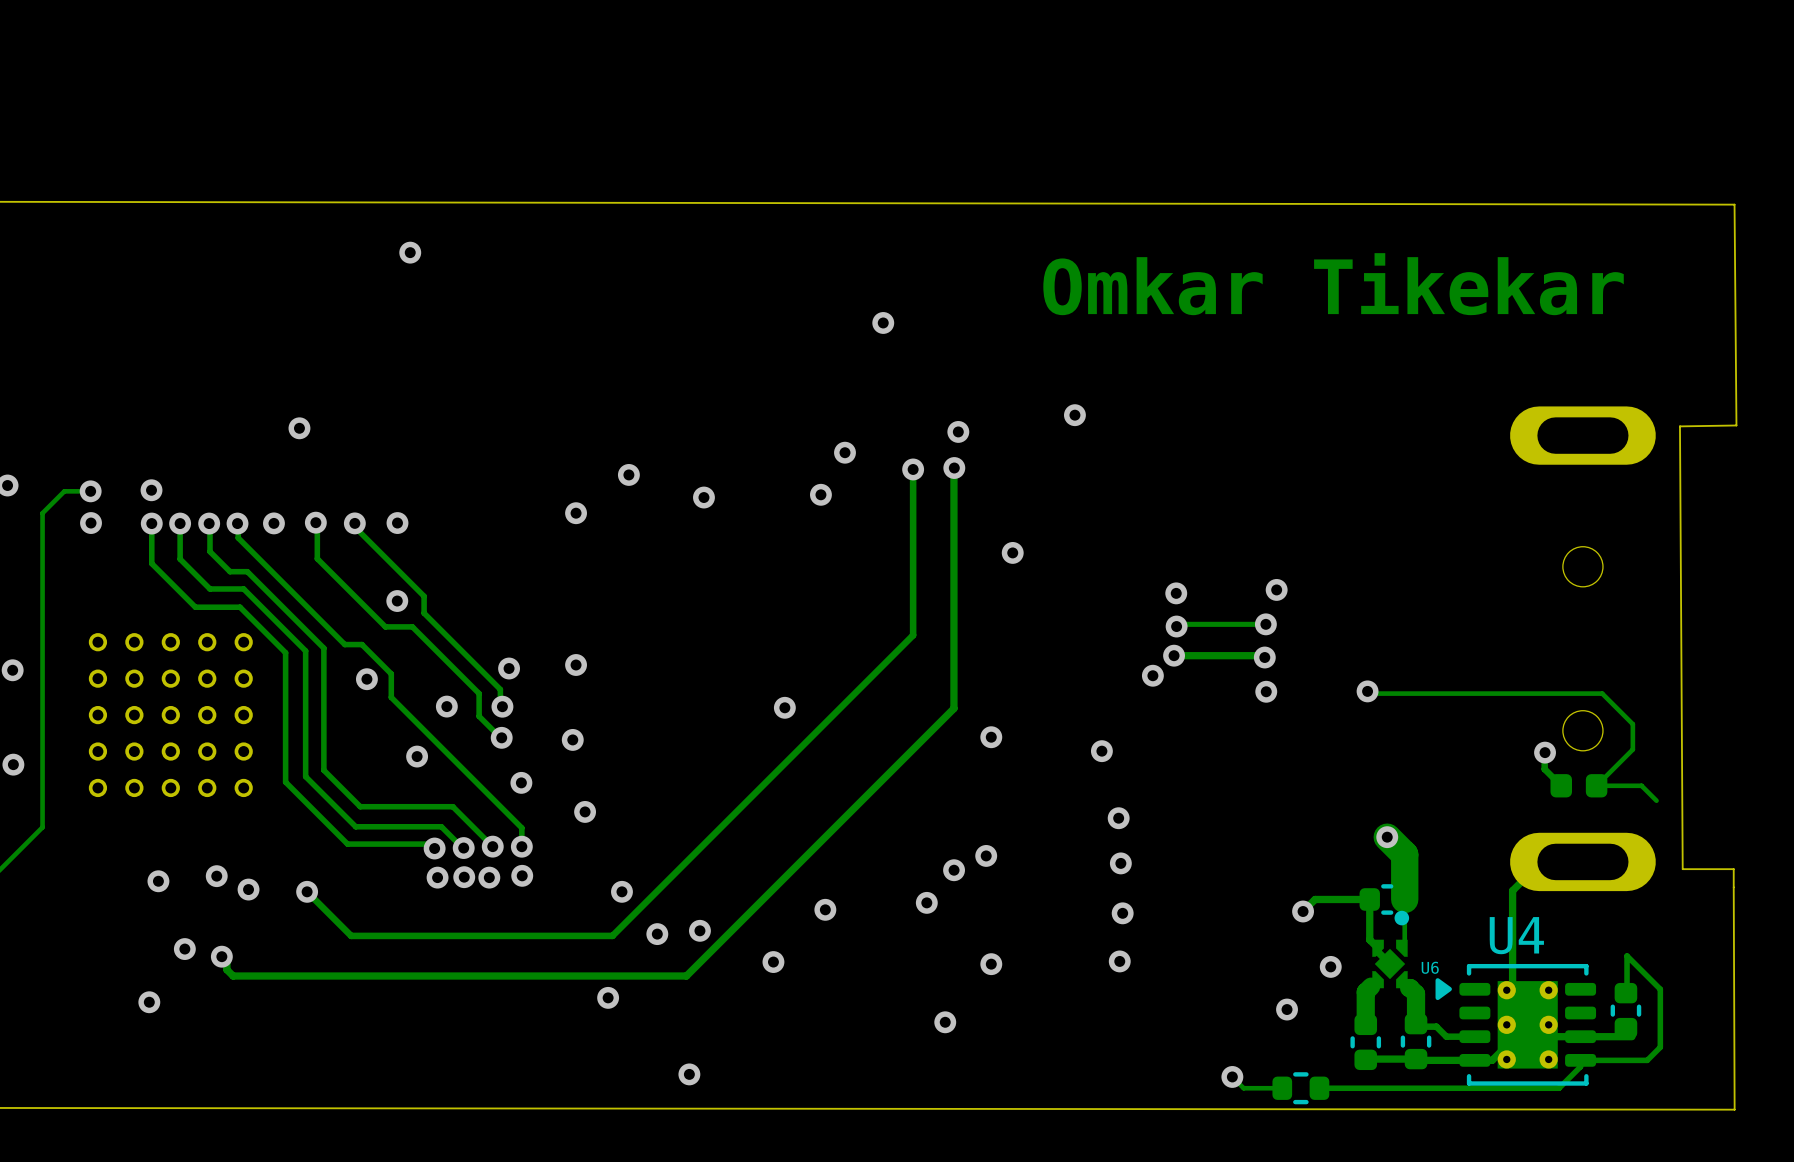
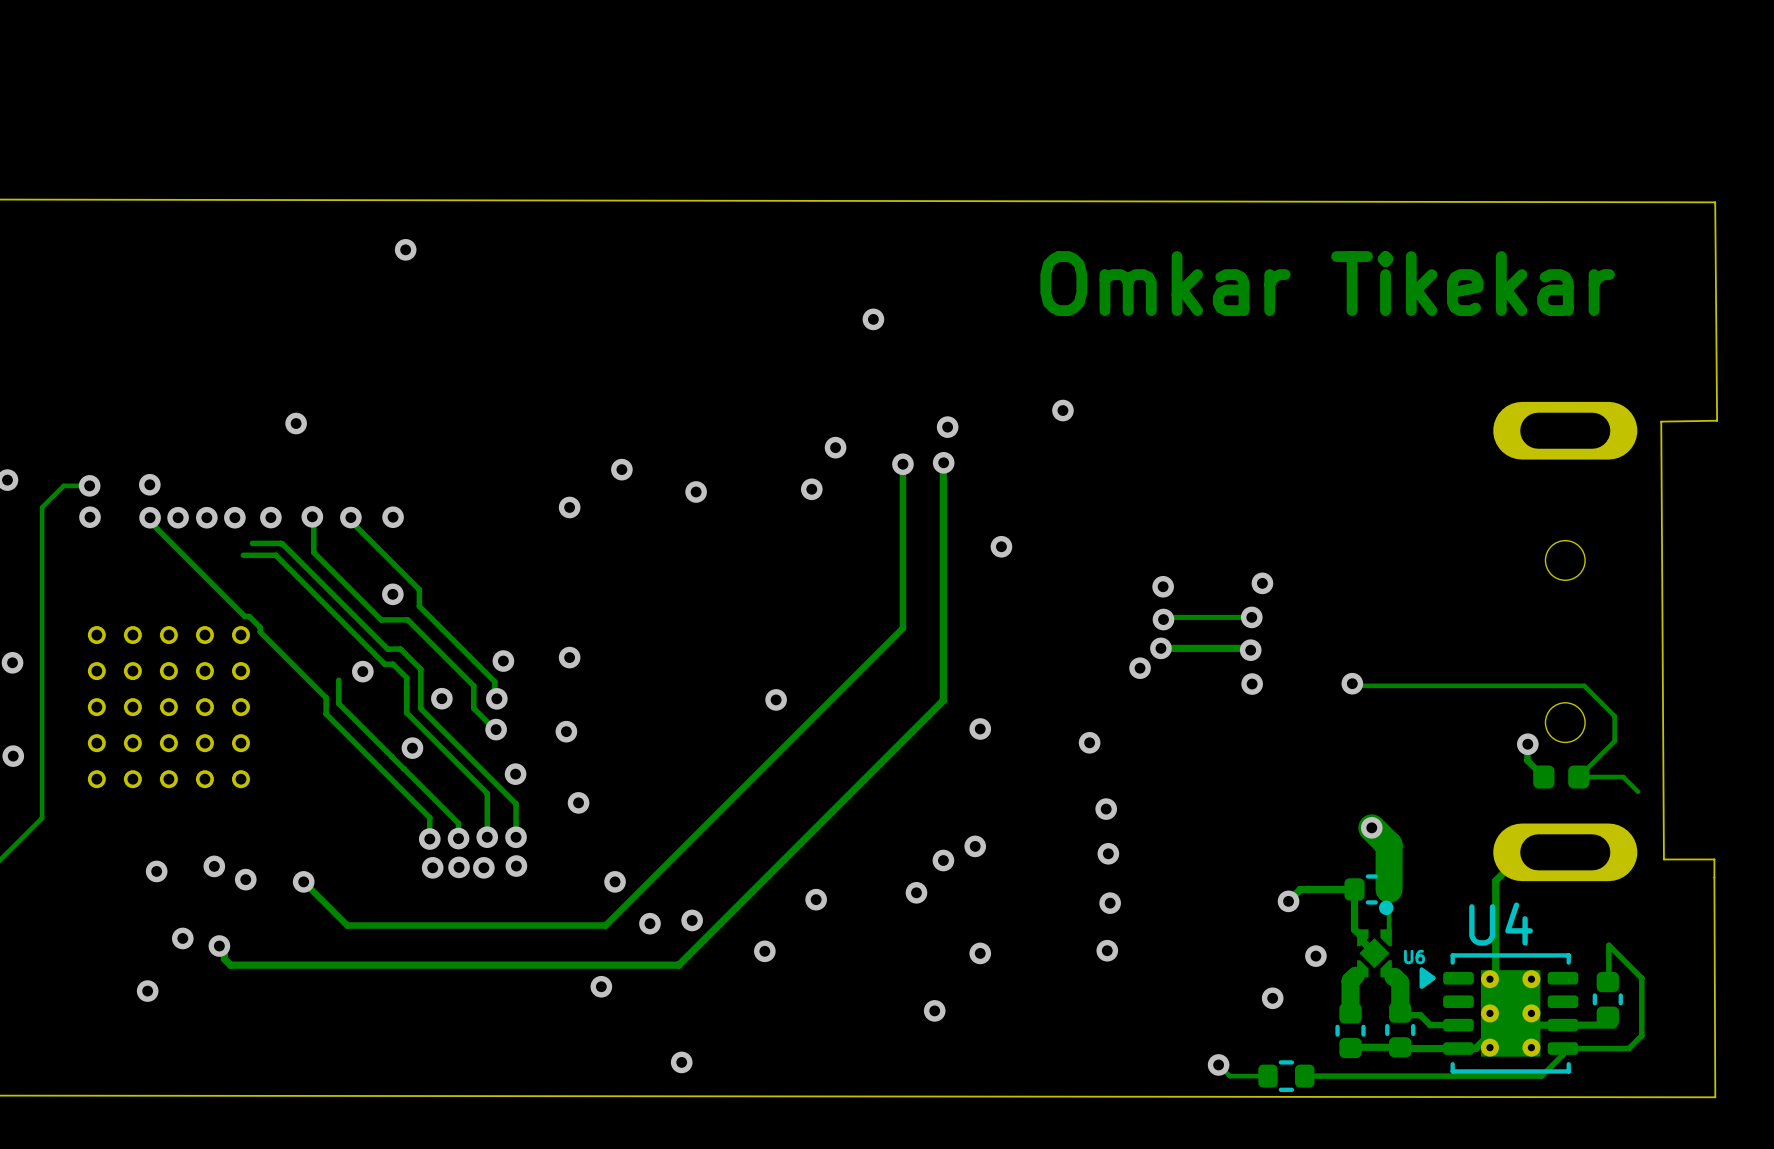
track: (209, 523) (210, 551) (230, 571) (247, 571) (323, 648) (323, 770) (360, 806) (452, 806) (492, 846) -> none
track: (237, 523) (238, 537) (344, 644) (361, 644) -> (243, 555) (275, 555) (357, 637)
track: (180, 525) (180, 559) (210, 589) (243, 589) (305, 650) (305, 776) (355, 826) (441, 826) (463, 848) -> (338, 680) (338, 703) (458, 823) (458, 838)
track: (151, 527) (151, 563) (195, 607) (240, 607) (285, 652) (285, 782) (347, 844) (430, 844) (434, 848) -> (150, 521) (244, 616) (249, 616) (260, 627) (260, 631) (326, 697) (326, 714) (429, 817) (429, 839)
track: none -> (252, 543) (282, 543) (387, 649) (400, 649) (420, 669) (420, 708) (516, 803) (516, 818)
track: (389, 671) (391, 673) (391, 697) (521, 827) -> (384, 664) (393, 664) (406, 677) (406, 712) (487, 793) (487, 837)

